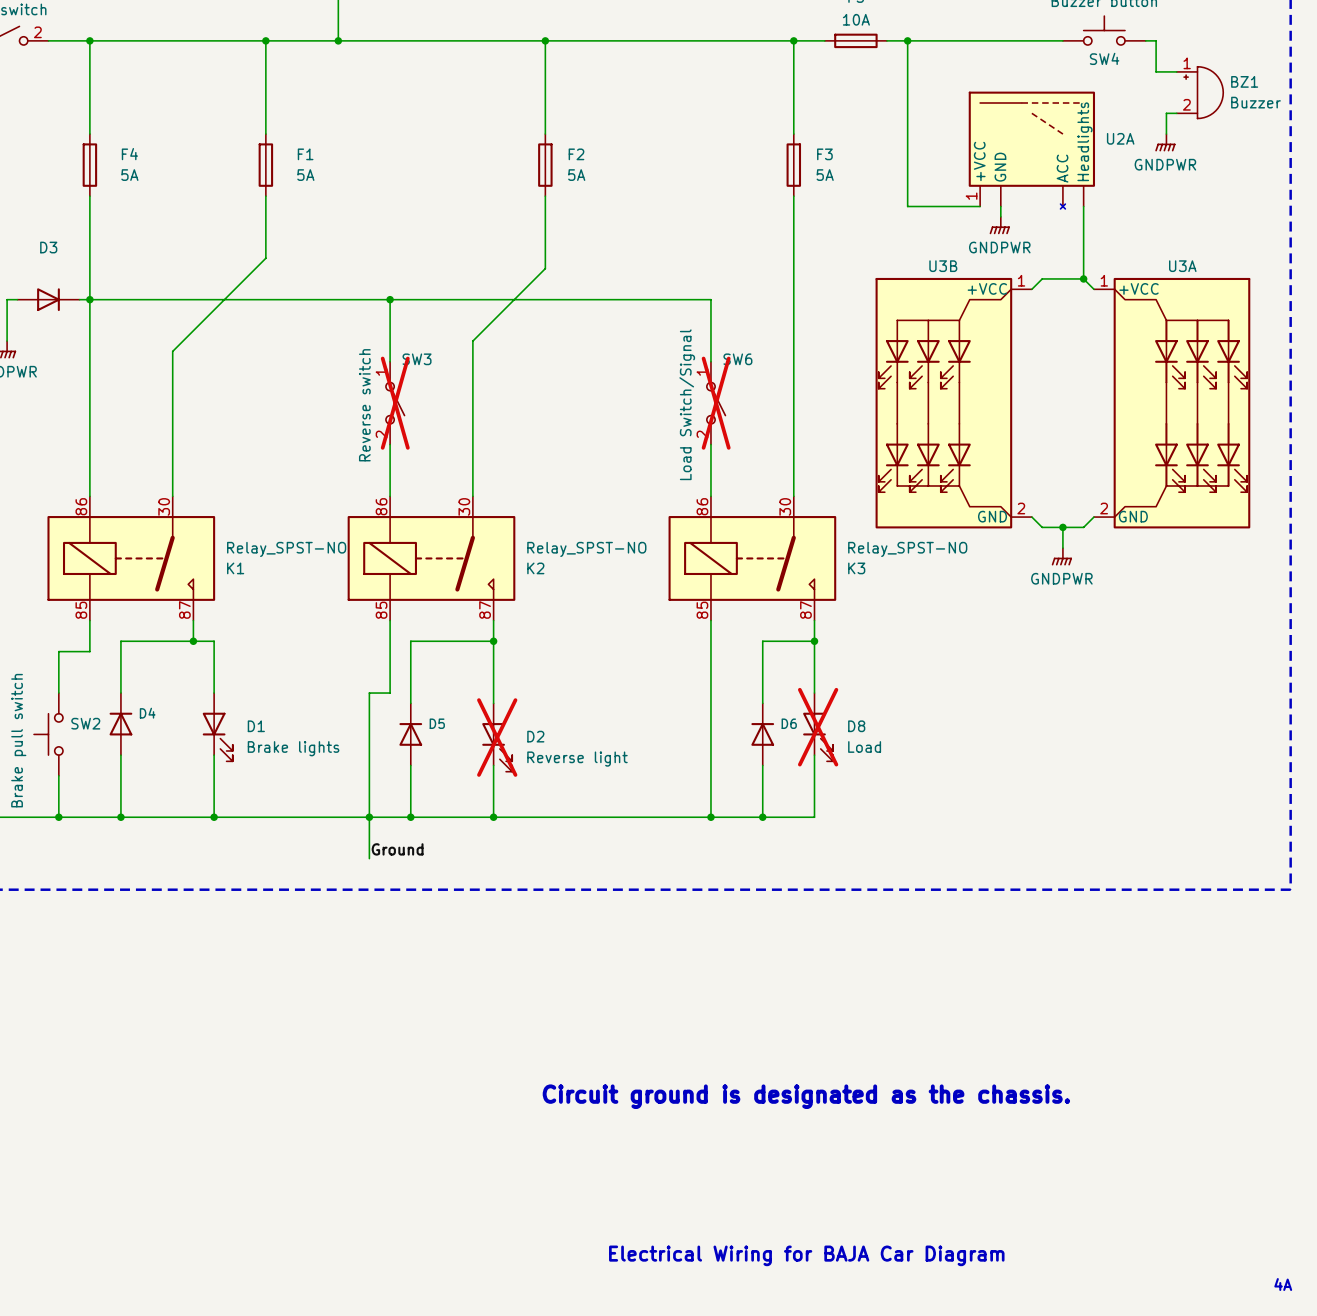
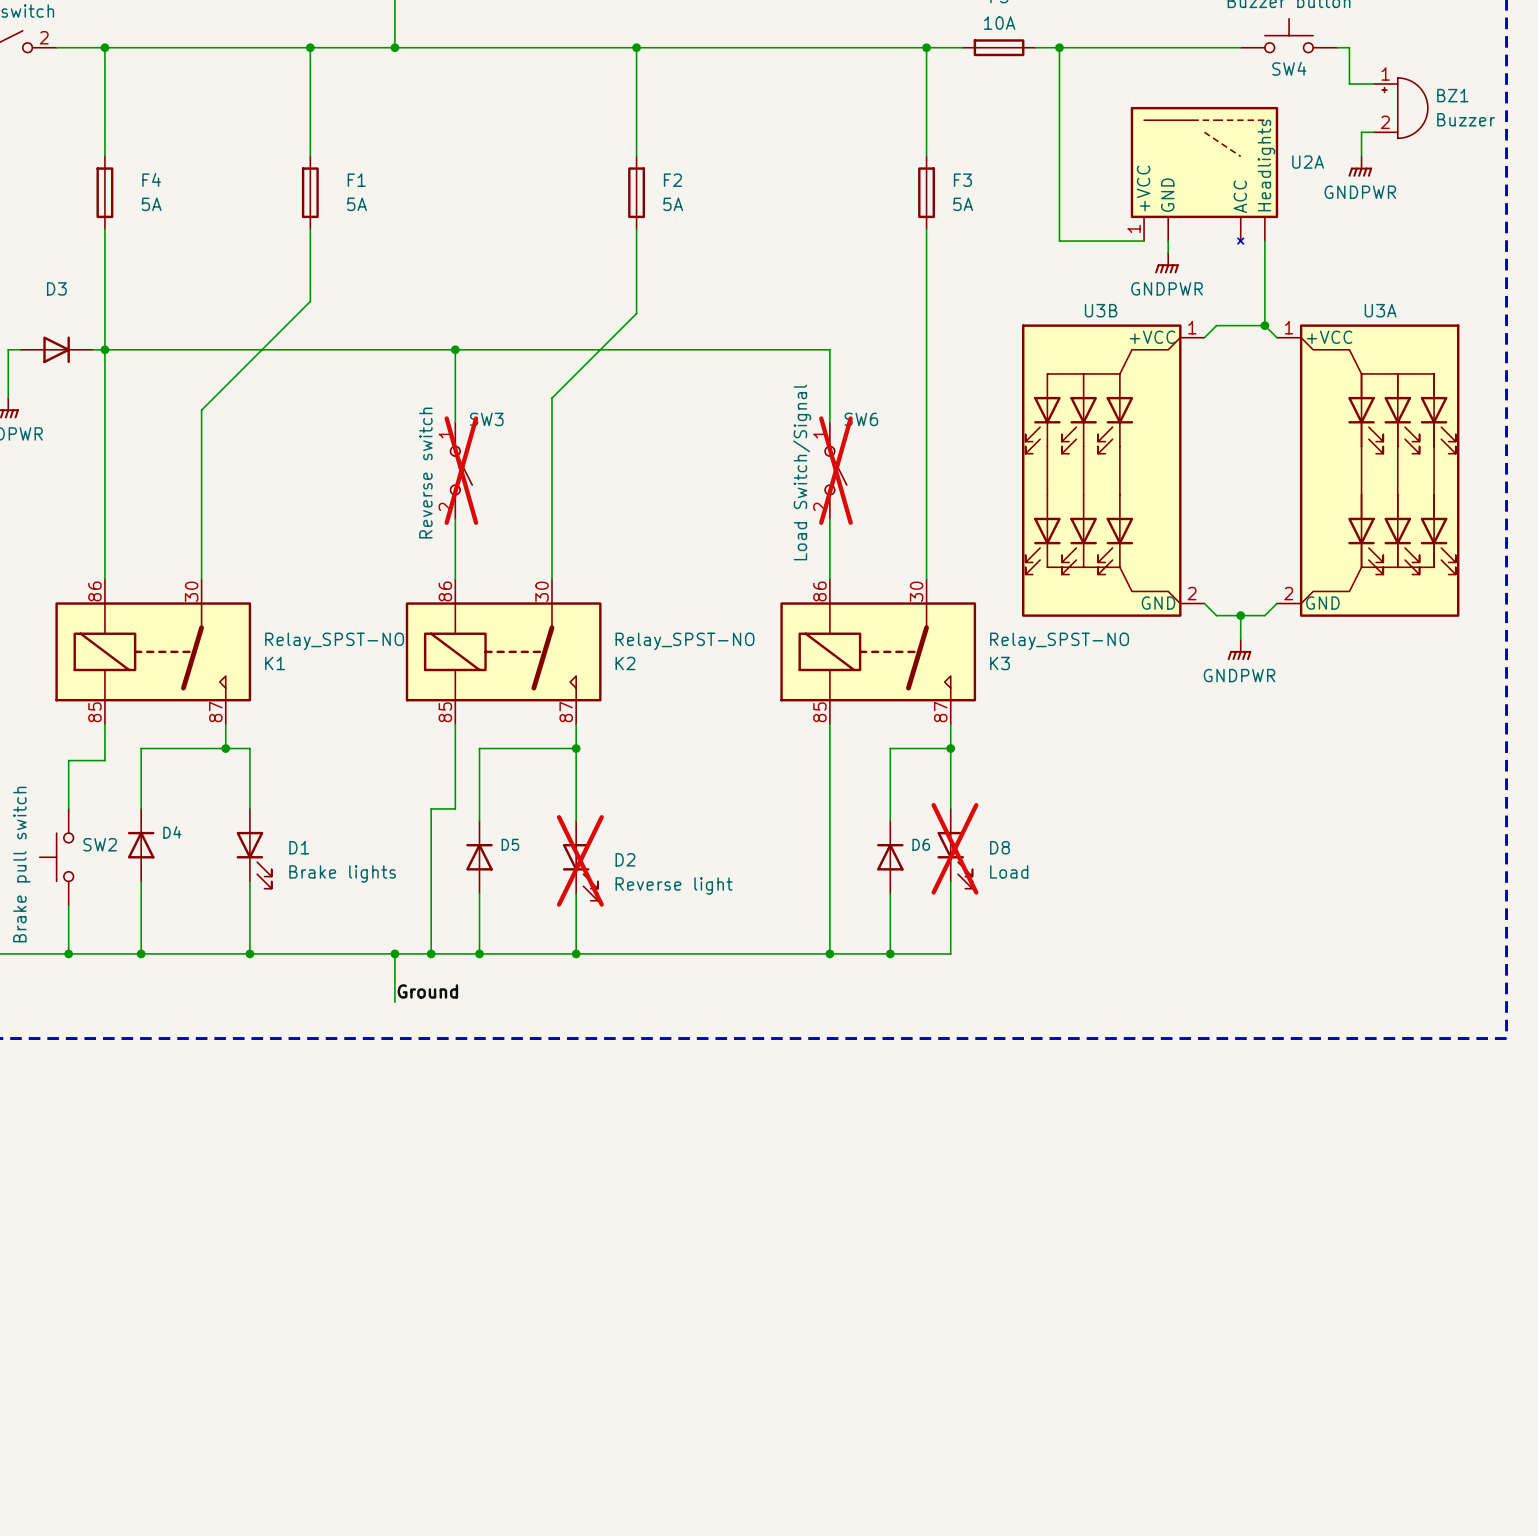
junction: none -> (394, 953)
wire: (369, 817) (369, 858) -> (394, 953) (394, 1002)
label position: Ground (397, 849) -> Ground (427, 991)
text: Circuit ground is designated as the chassis. (806, 1096) -> none
text: Electrical Wiring for BAJA Car Diagram (806, 1255) -> none
text: 4A (1283, 1284) -> none

